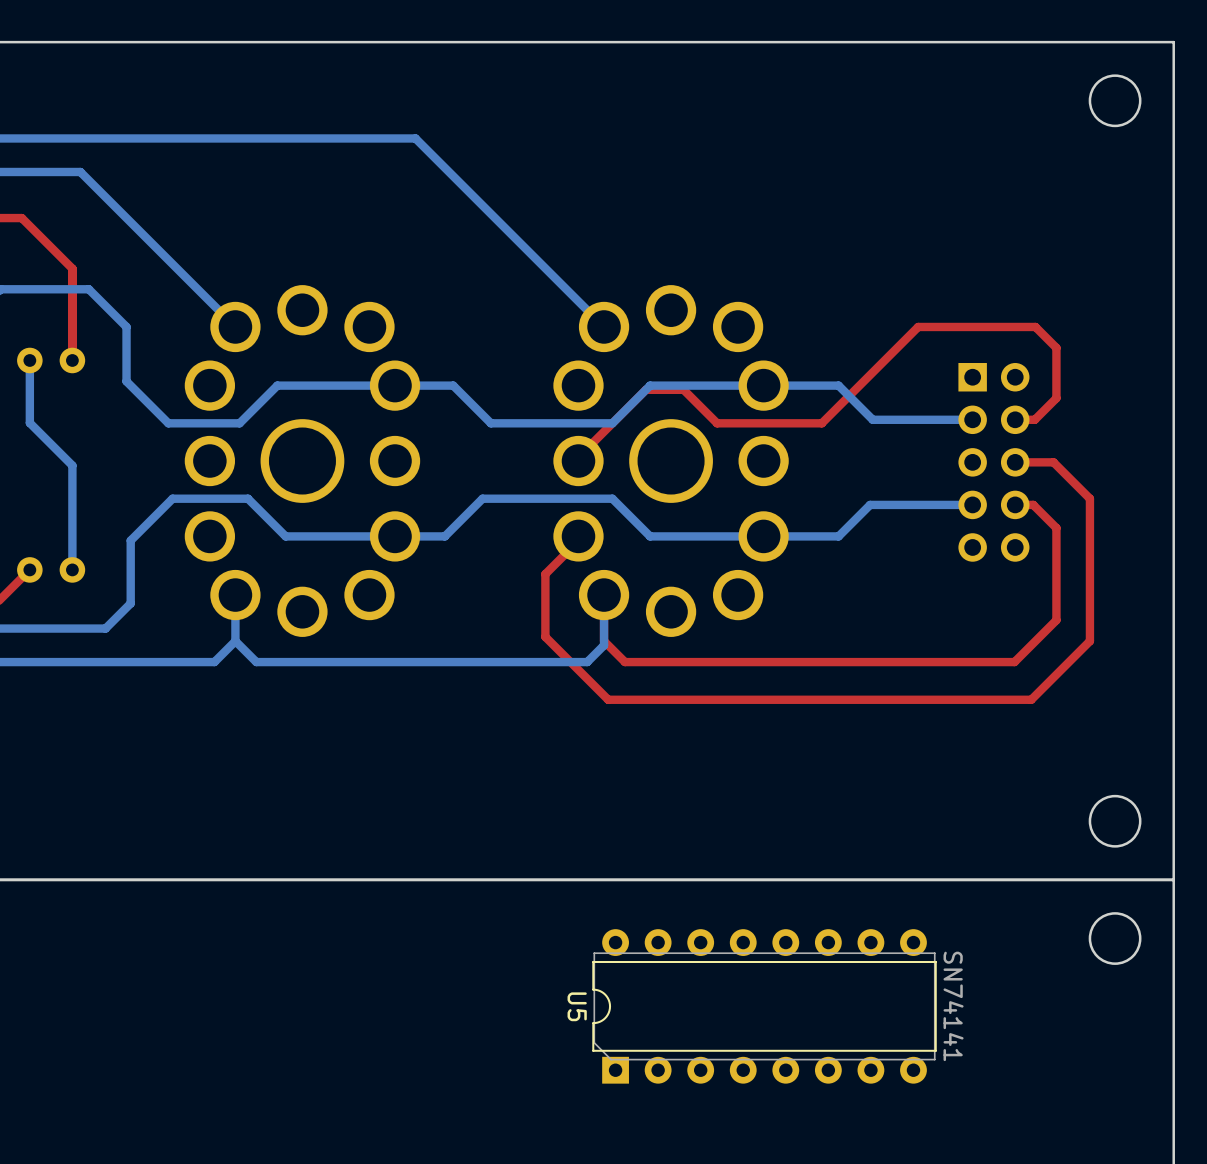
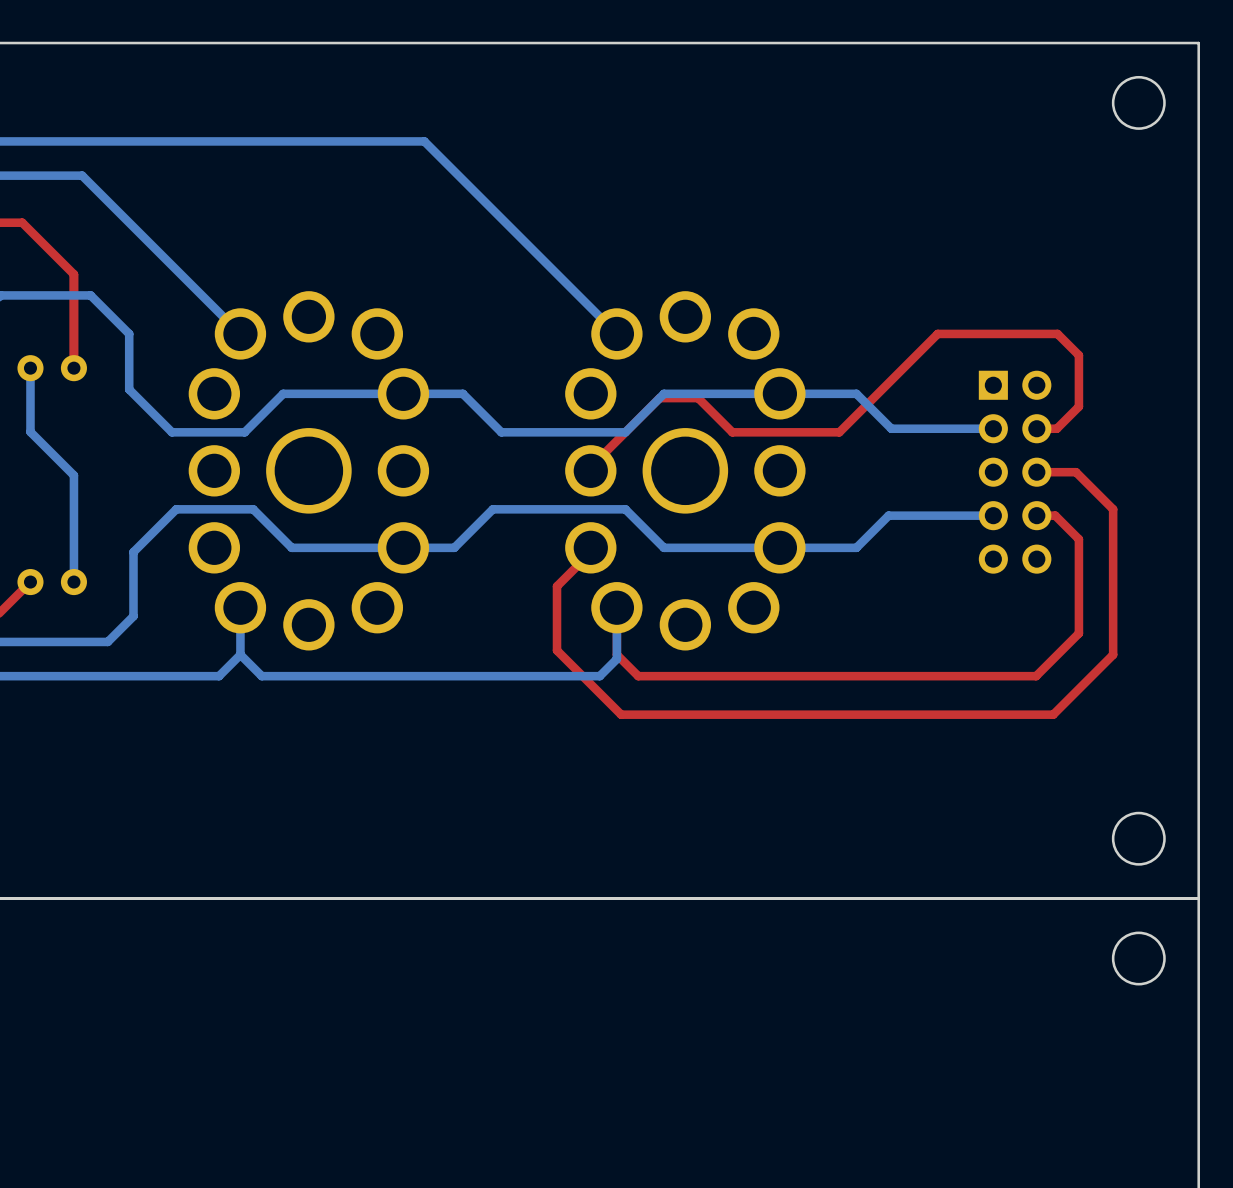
U5: SN74141 (764, 1006) -> none

